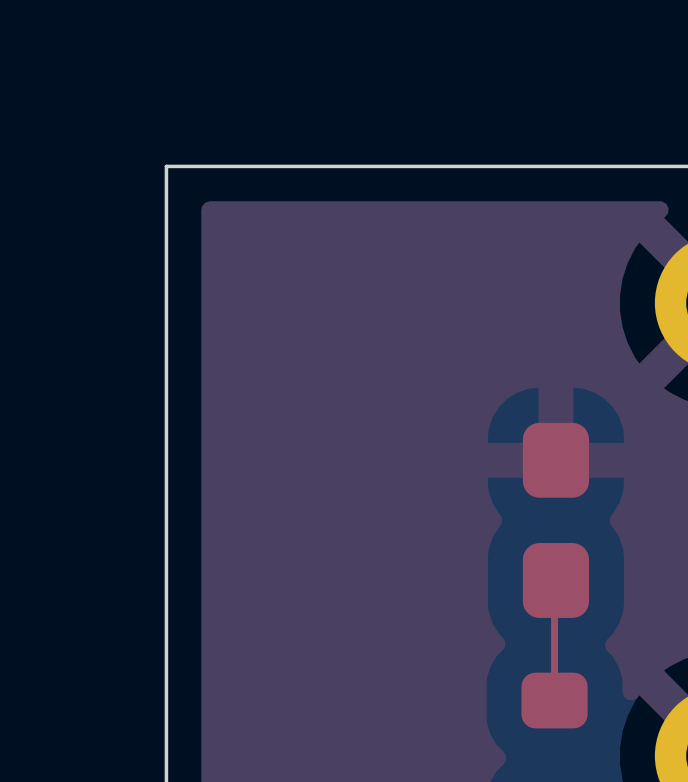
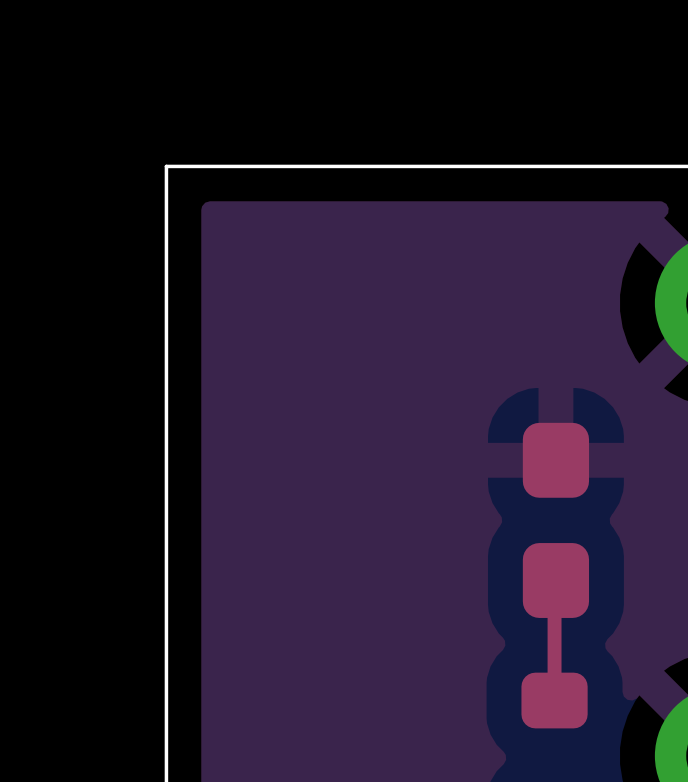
top track width: thin (555, 580) (554, 700) -> thick (555, 580) (554, 700)

